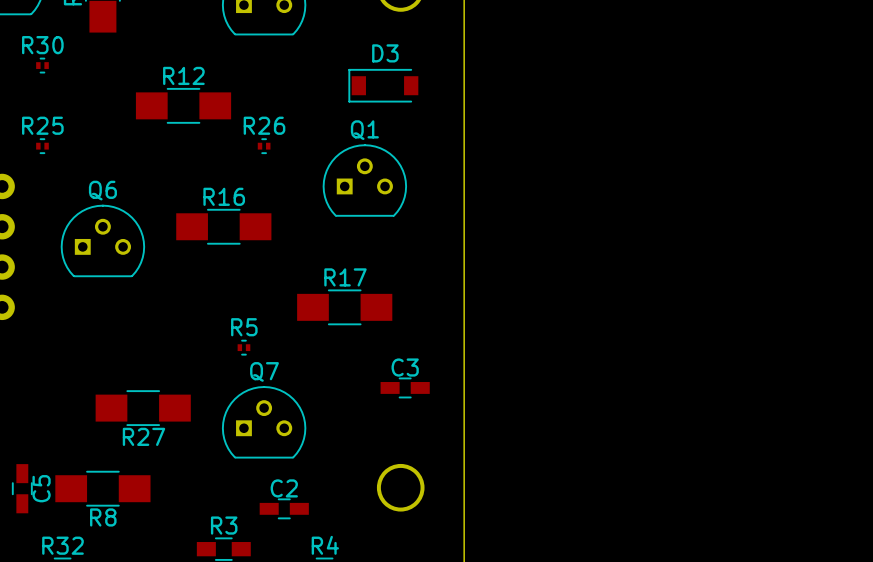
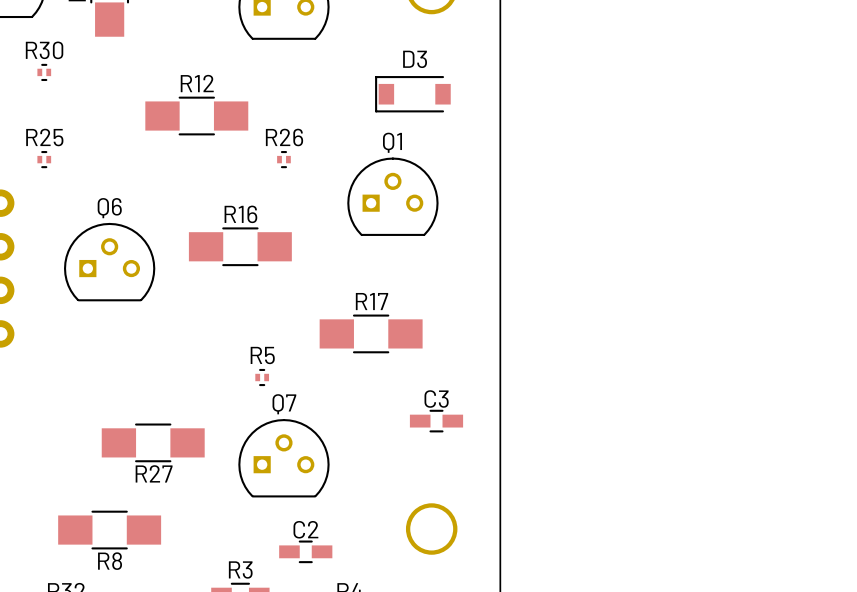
C5: (22, 488) -> none

